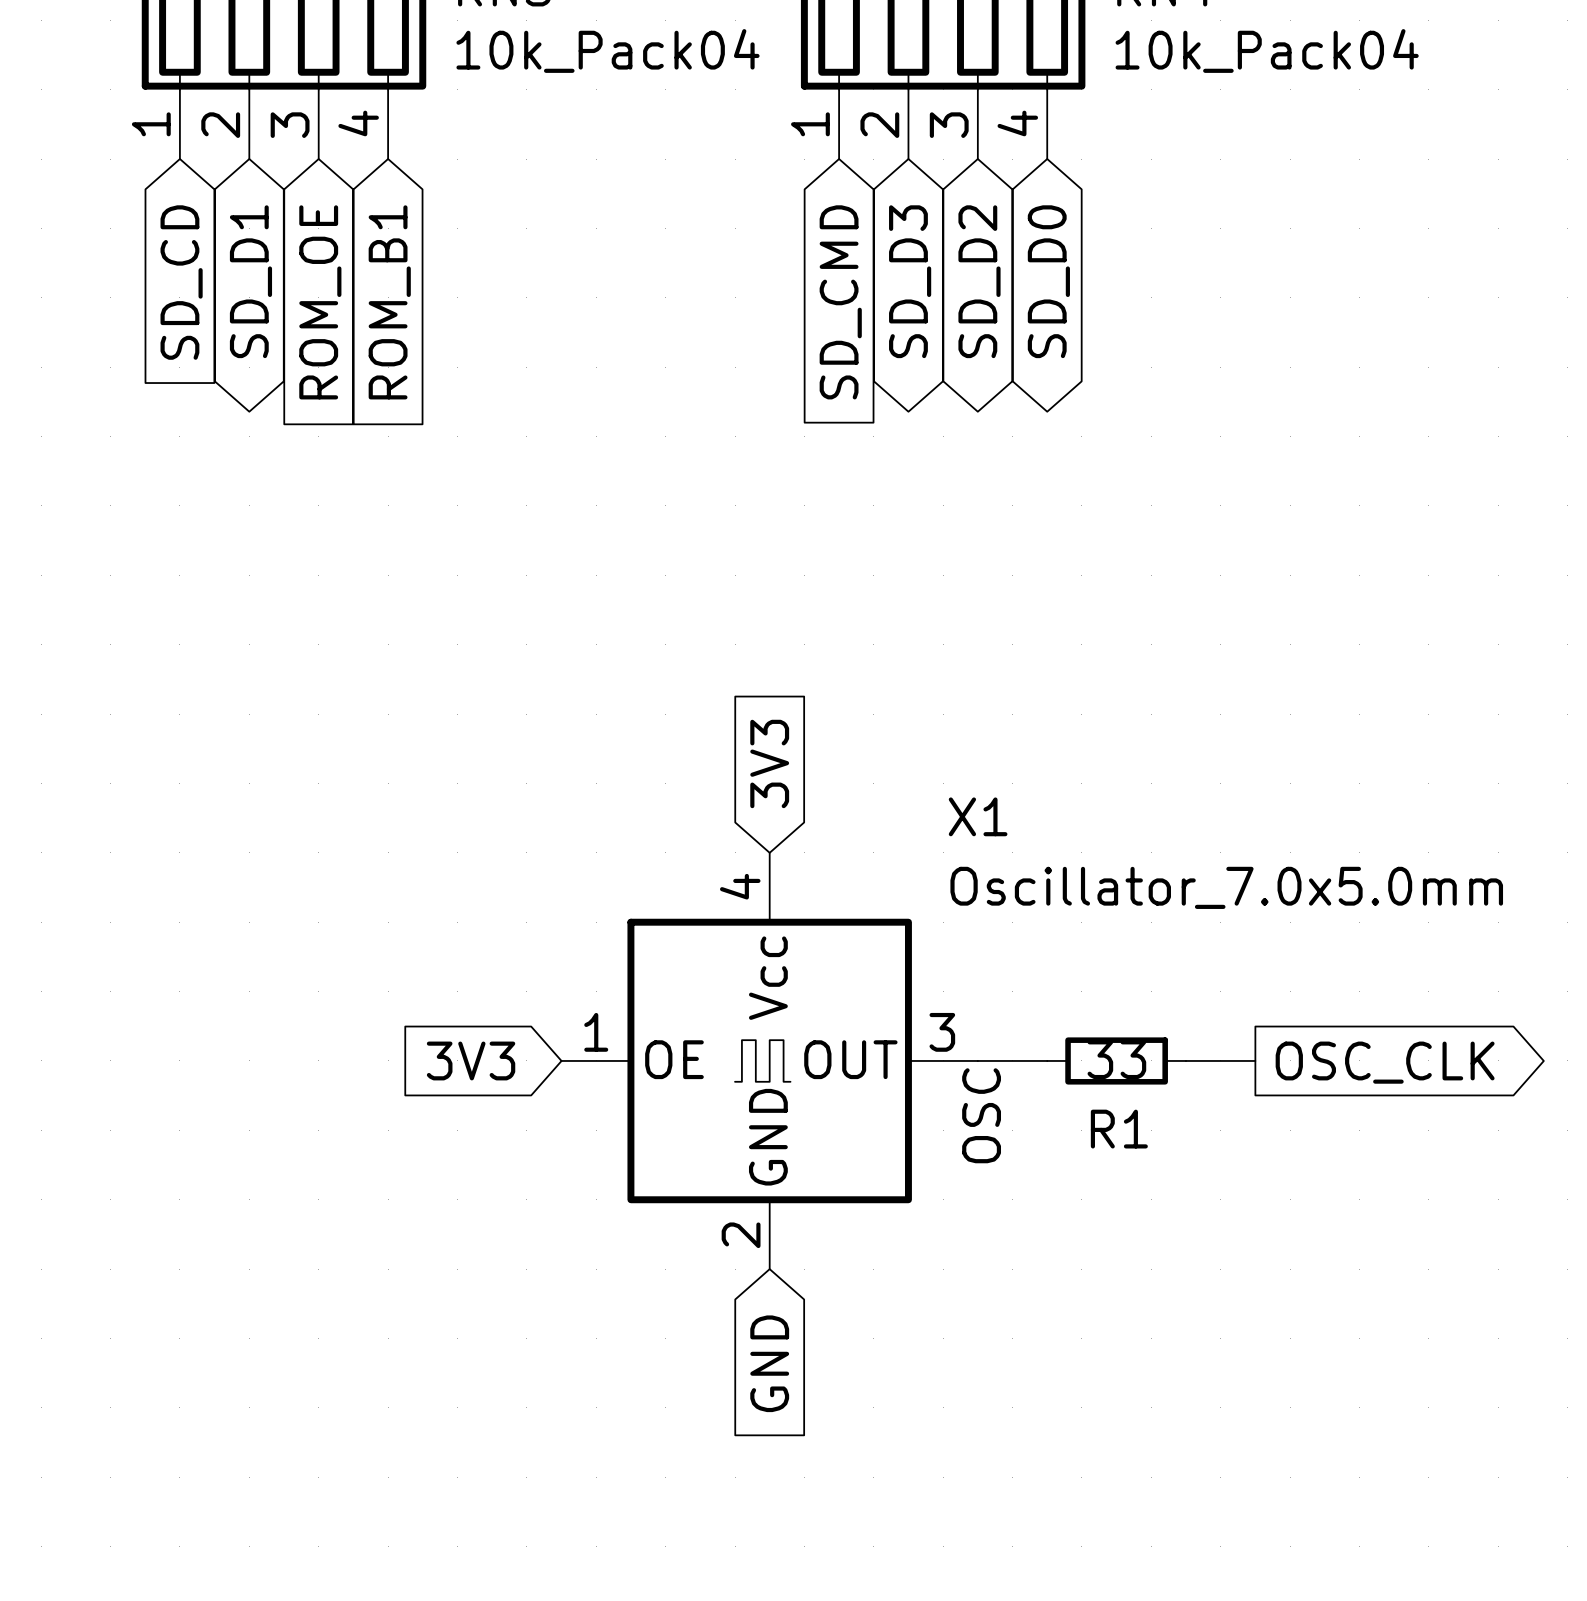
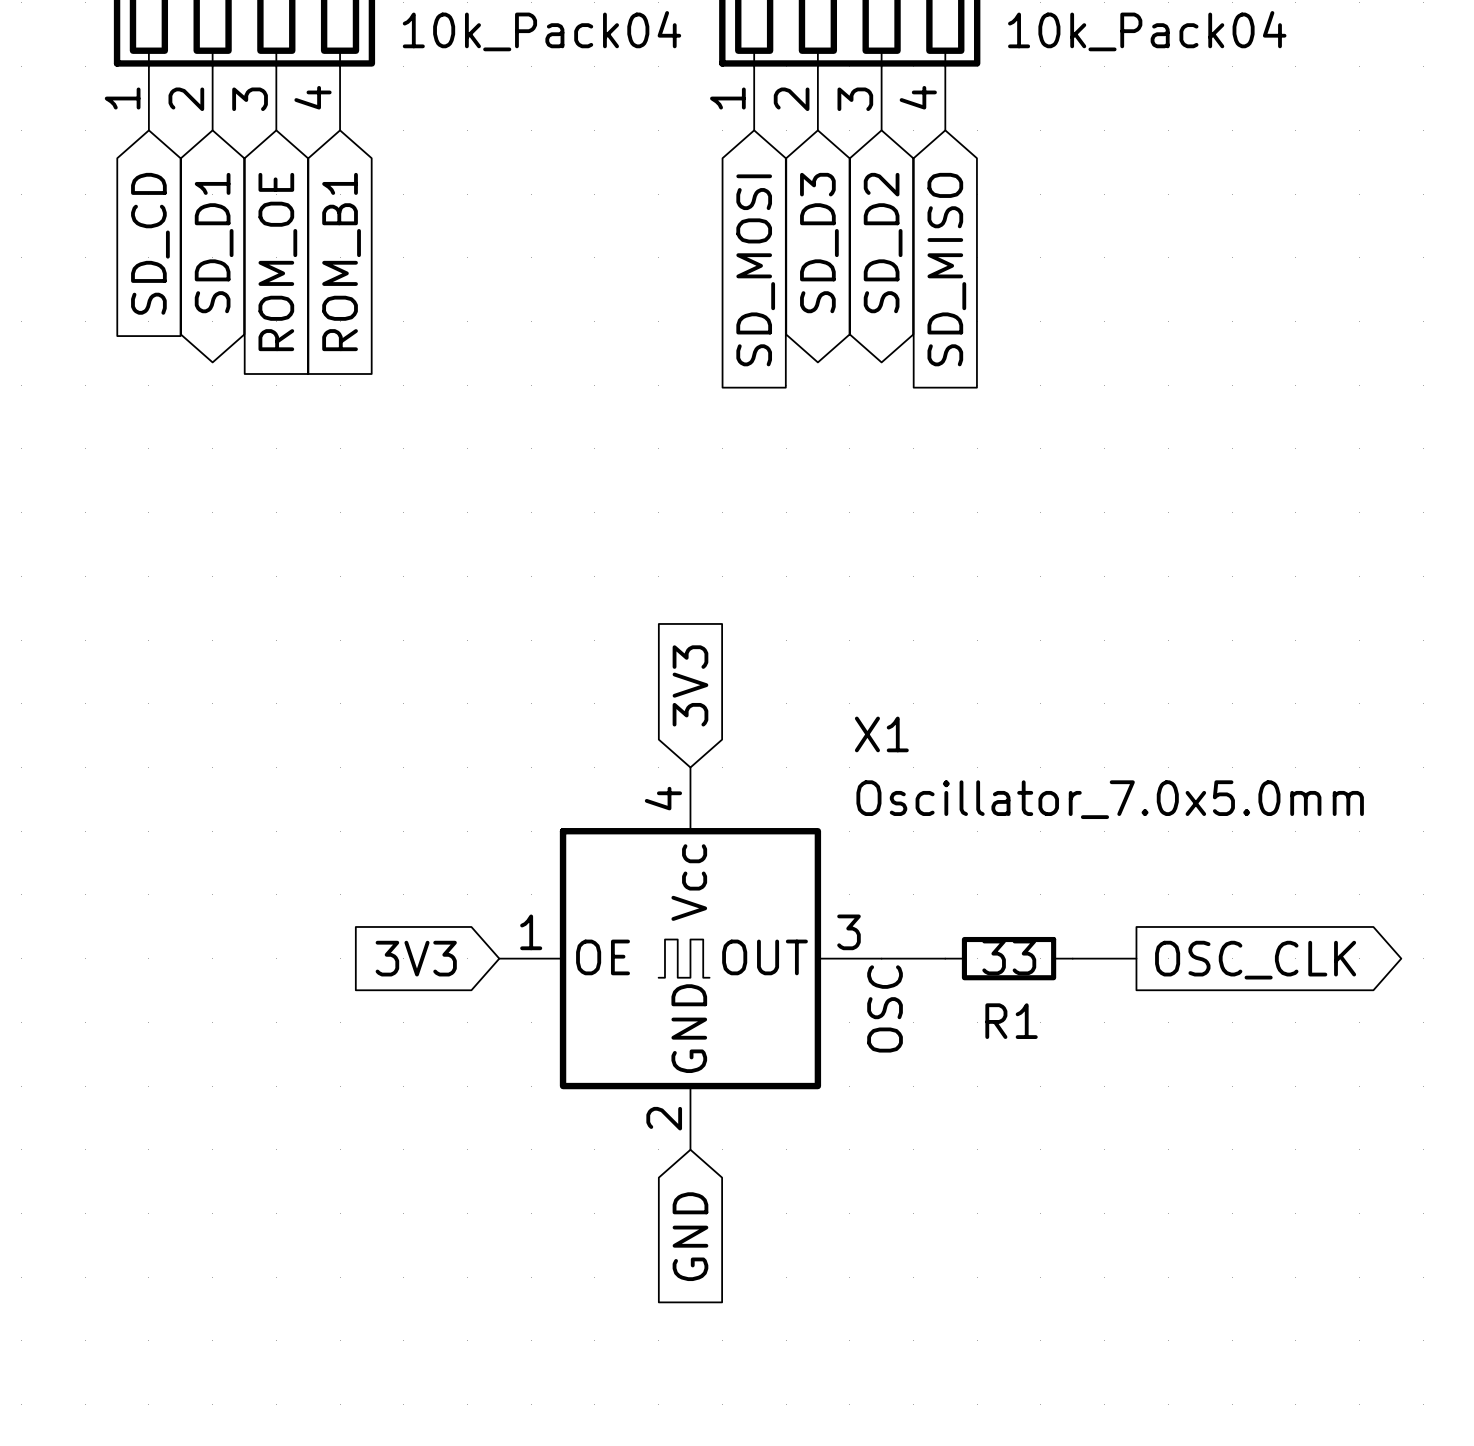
global label shape: bidirectional (1048, 281) -> input (946, 269)
global label: SD_D0 (1048, 281) -> SD_MISO (946, 269)
global label: SD_CMD (840, 302) -> SD_MOSI (755, 270)

